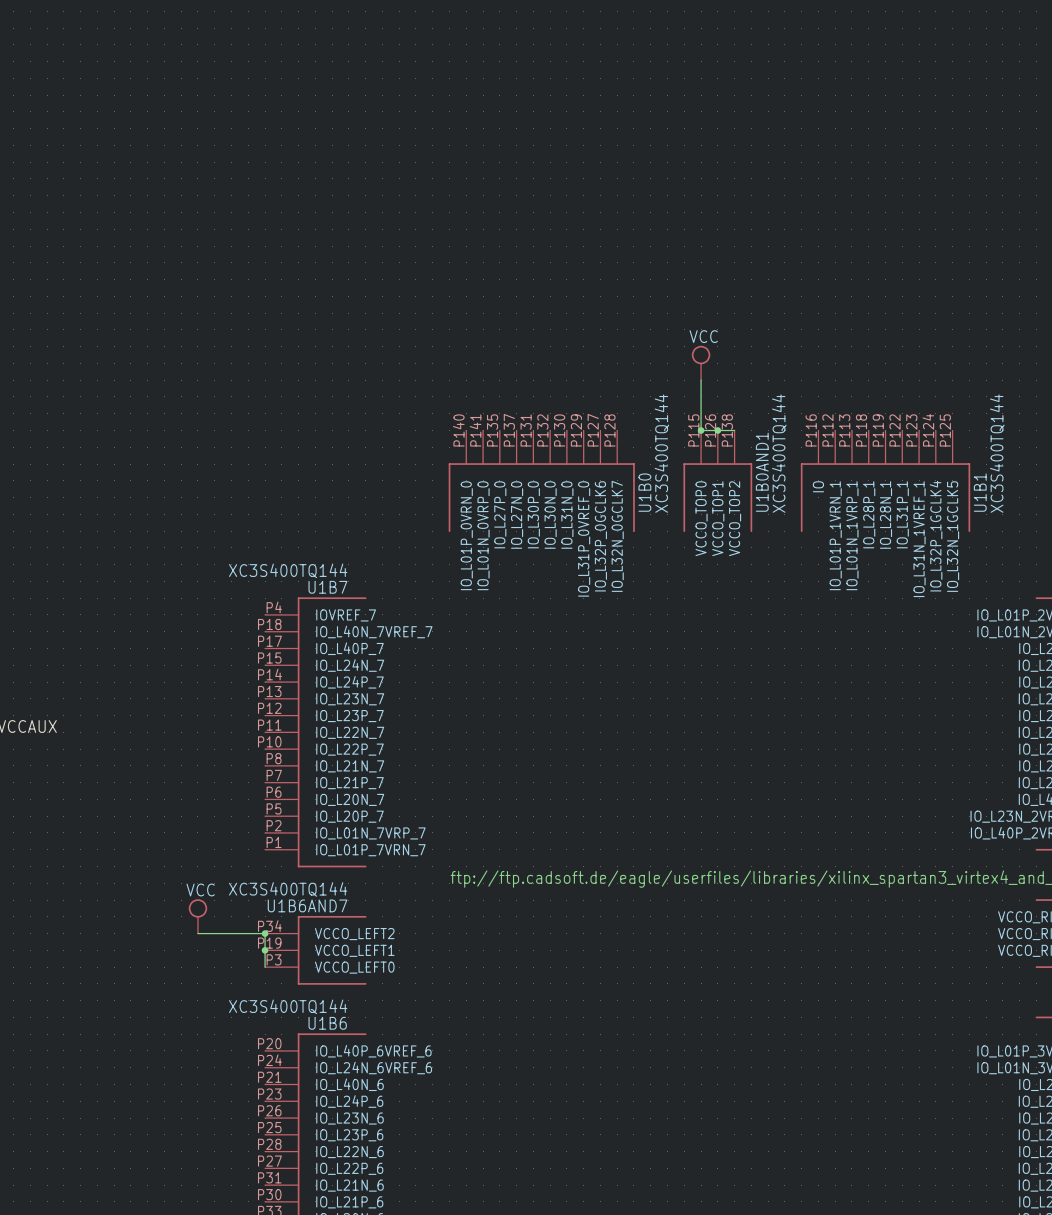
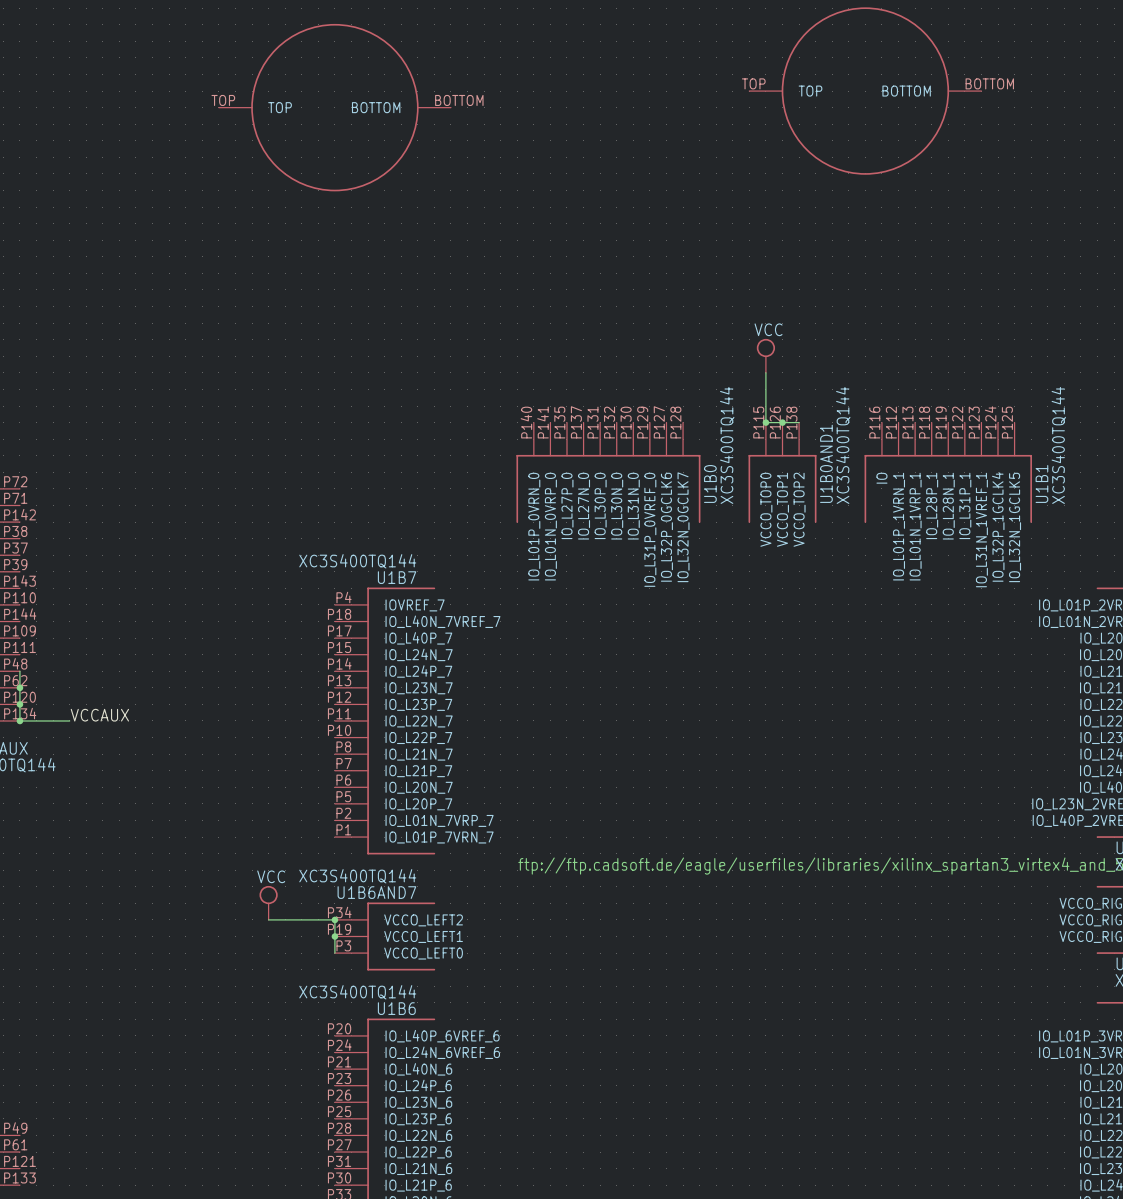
part: none -> (865, 91)
part: none -> (334, 107)

